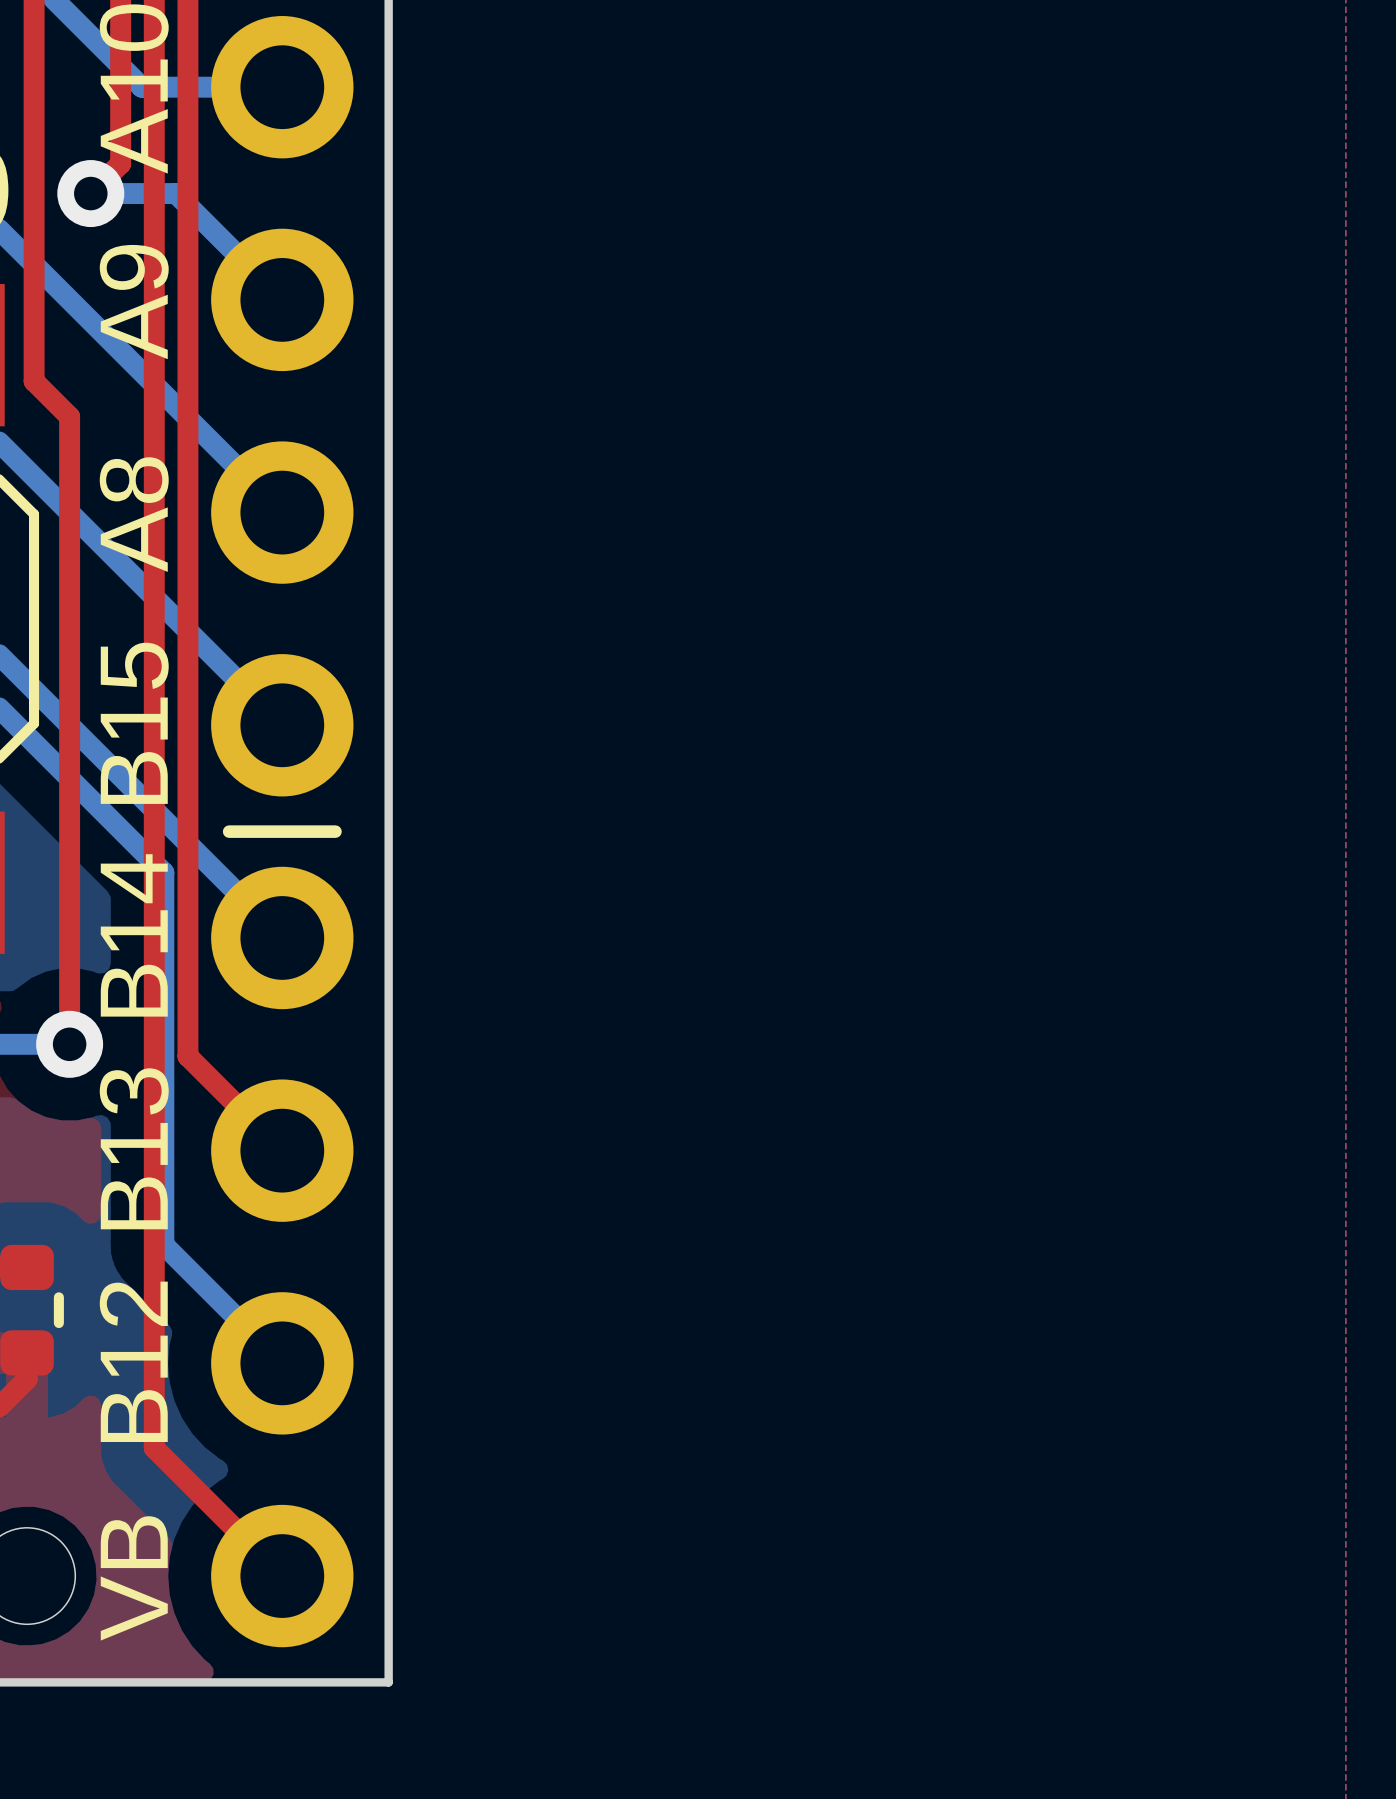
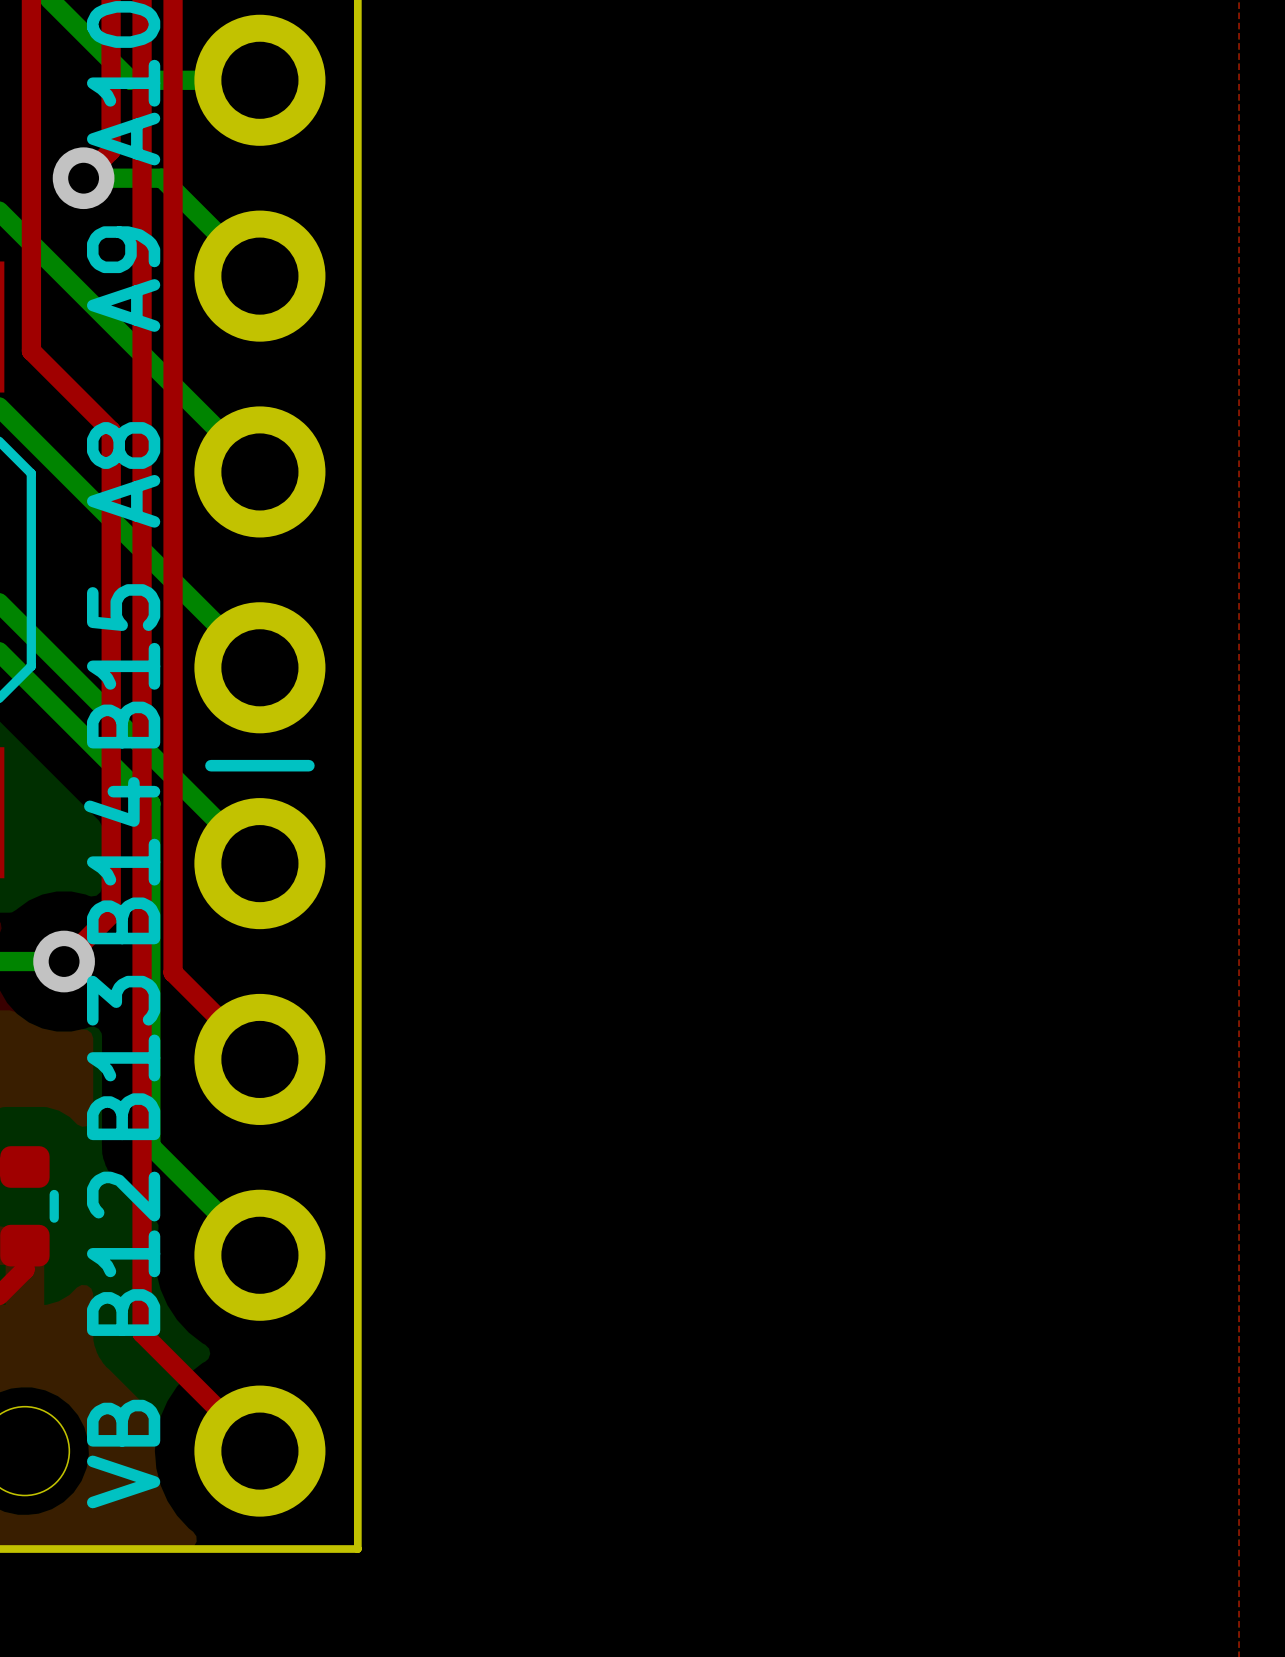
top track: (69, 416) (69, 1044) -> (64, 383) (111, 430) (111, 914) (64, 961)

